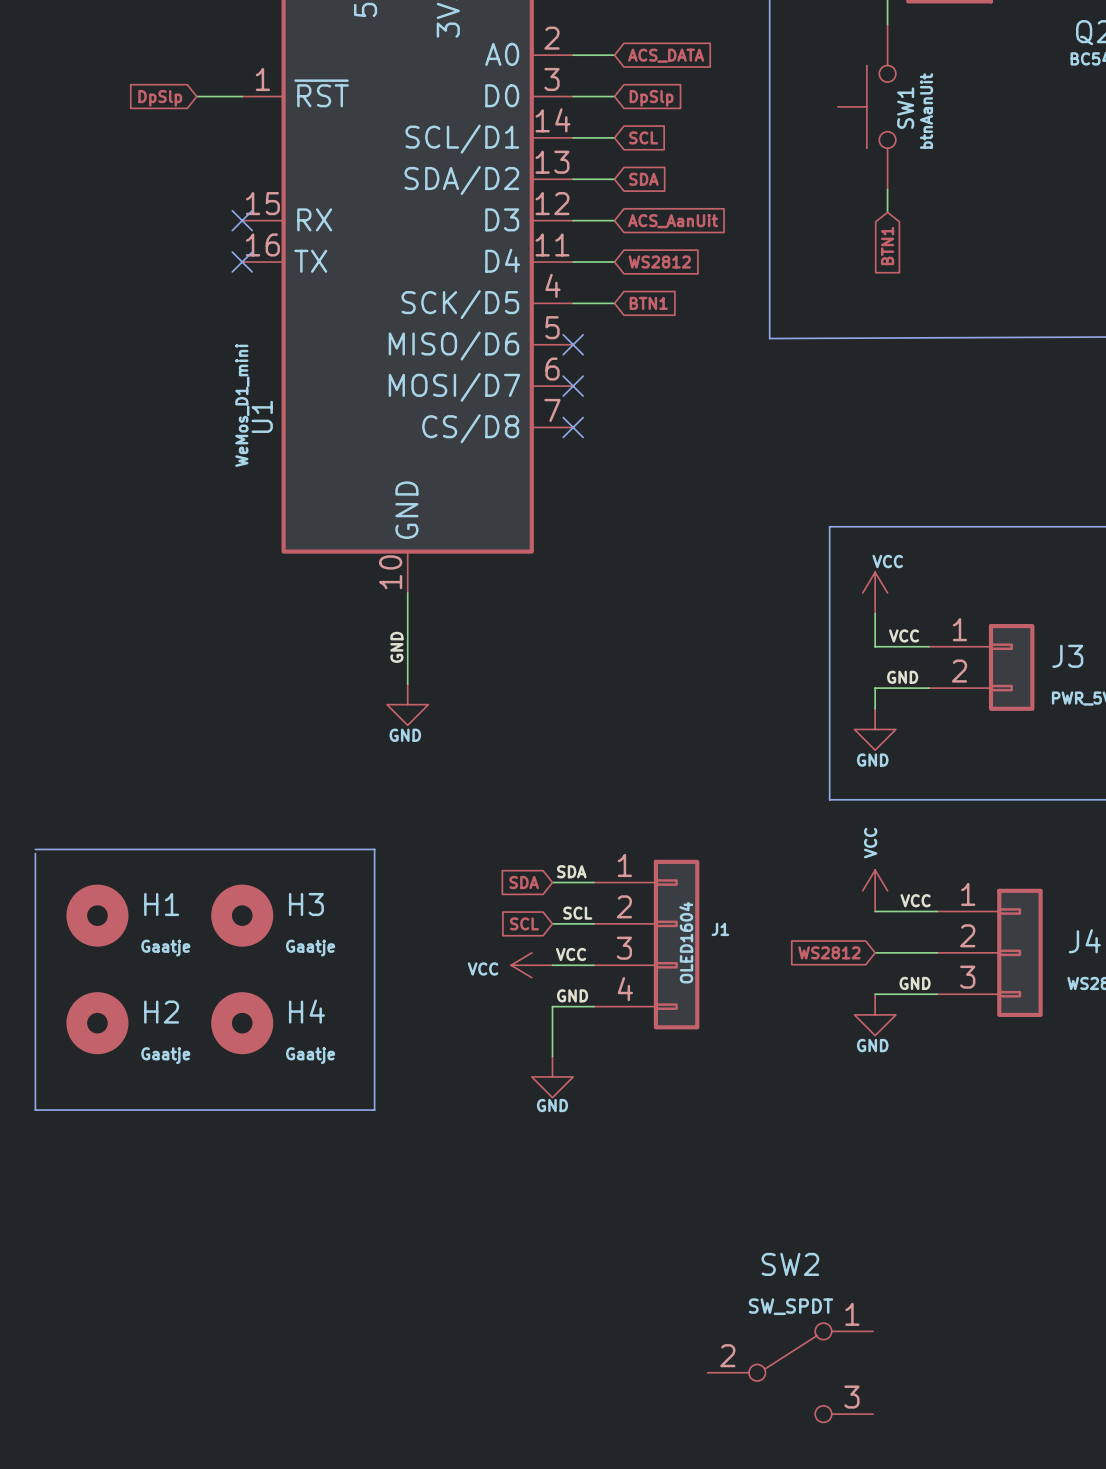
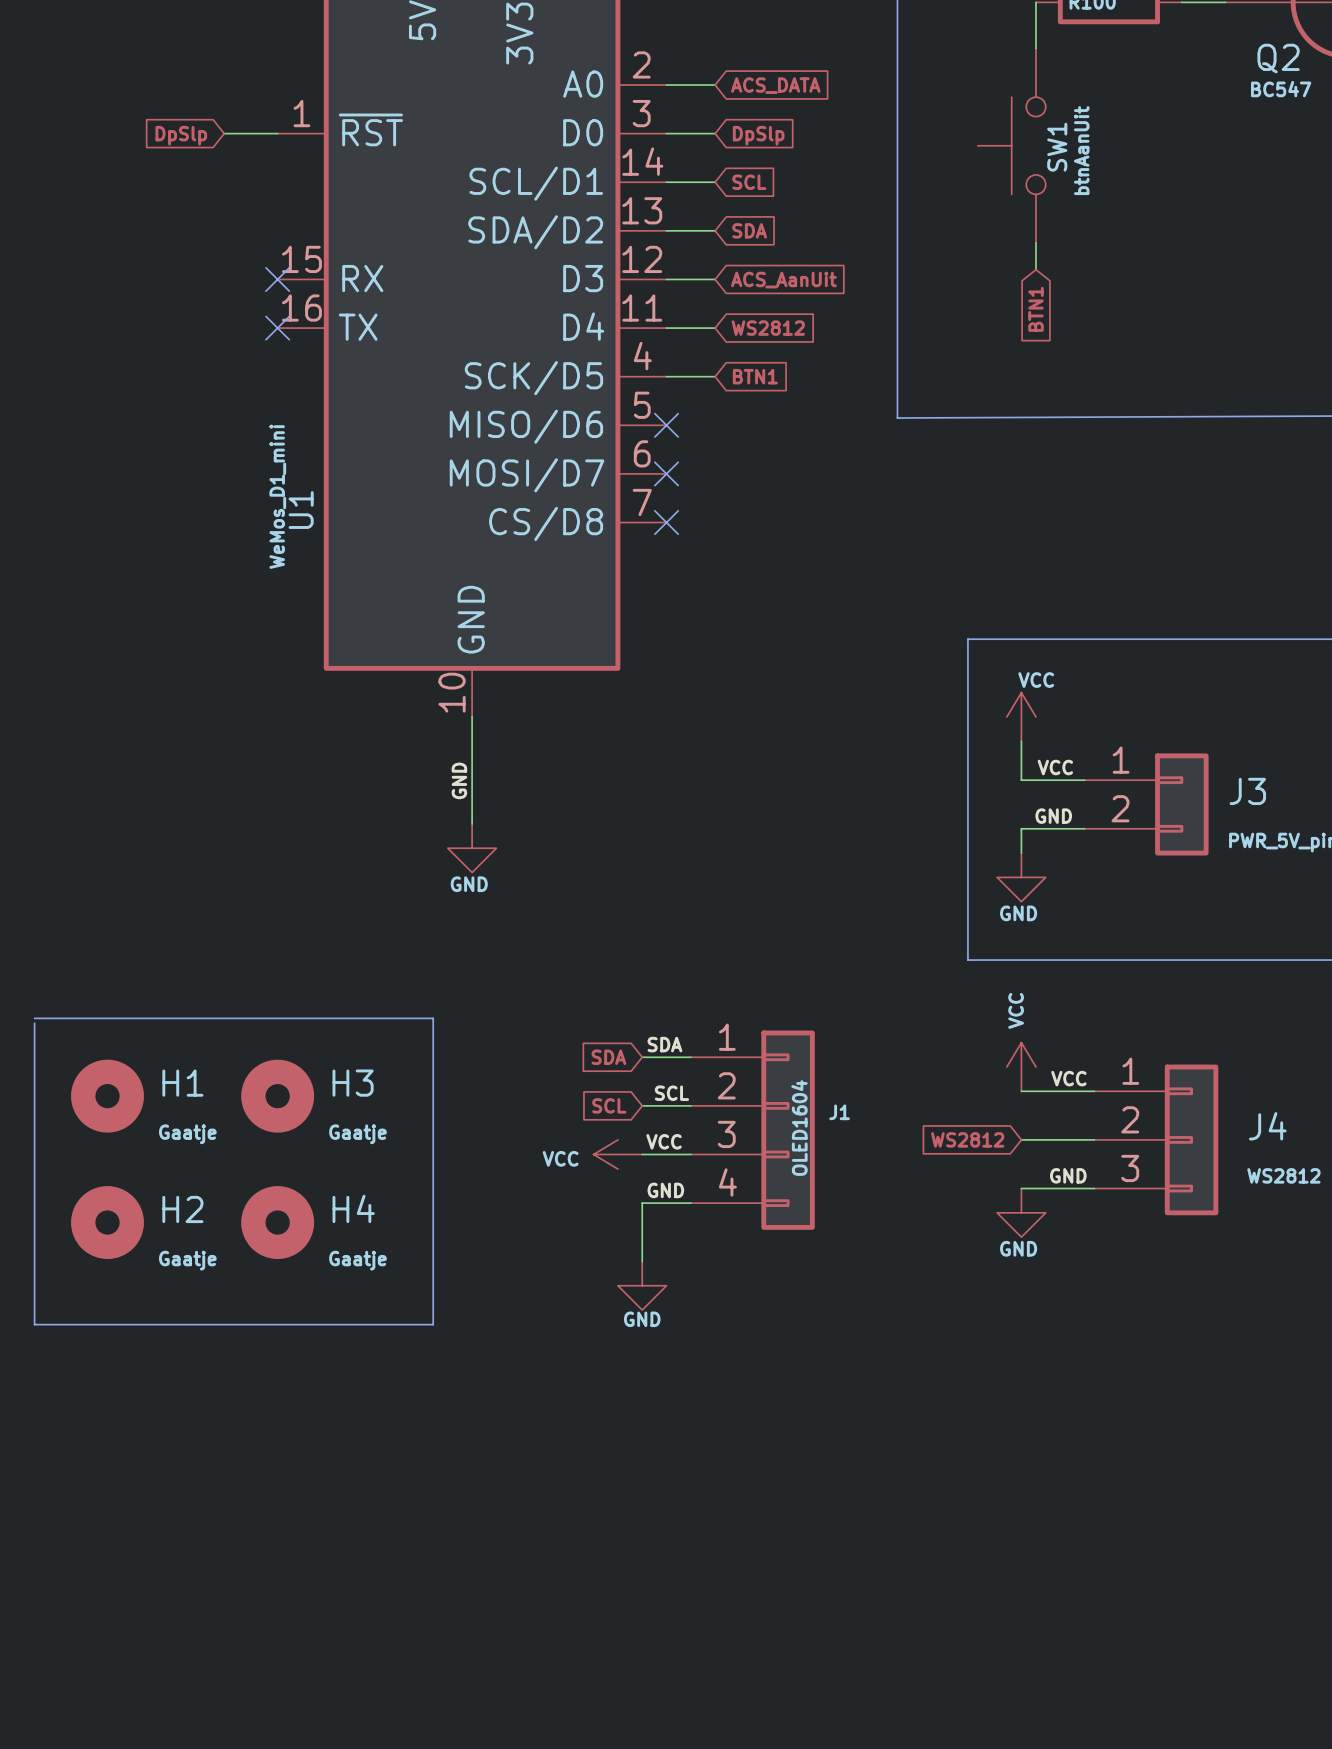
SW2: SW_SPDT (790, 1372) -> none

